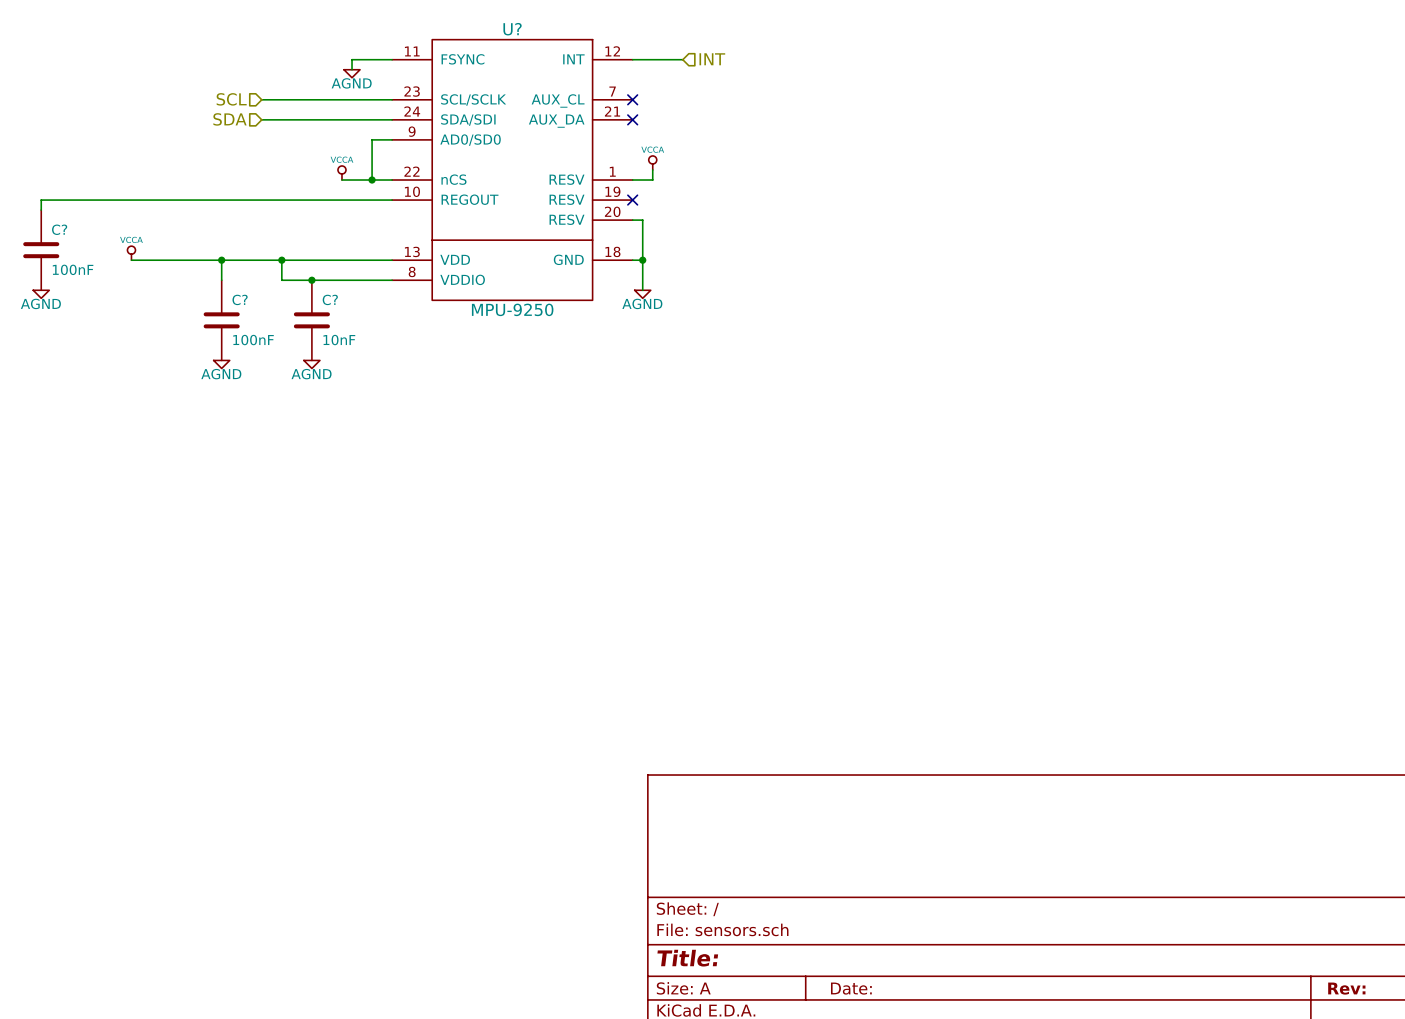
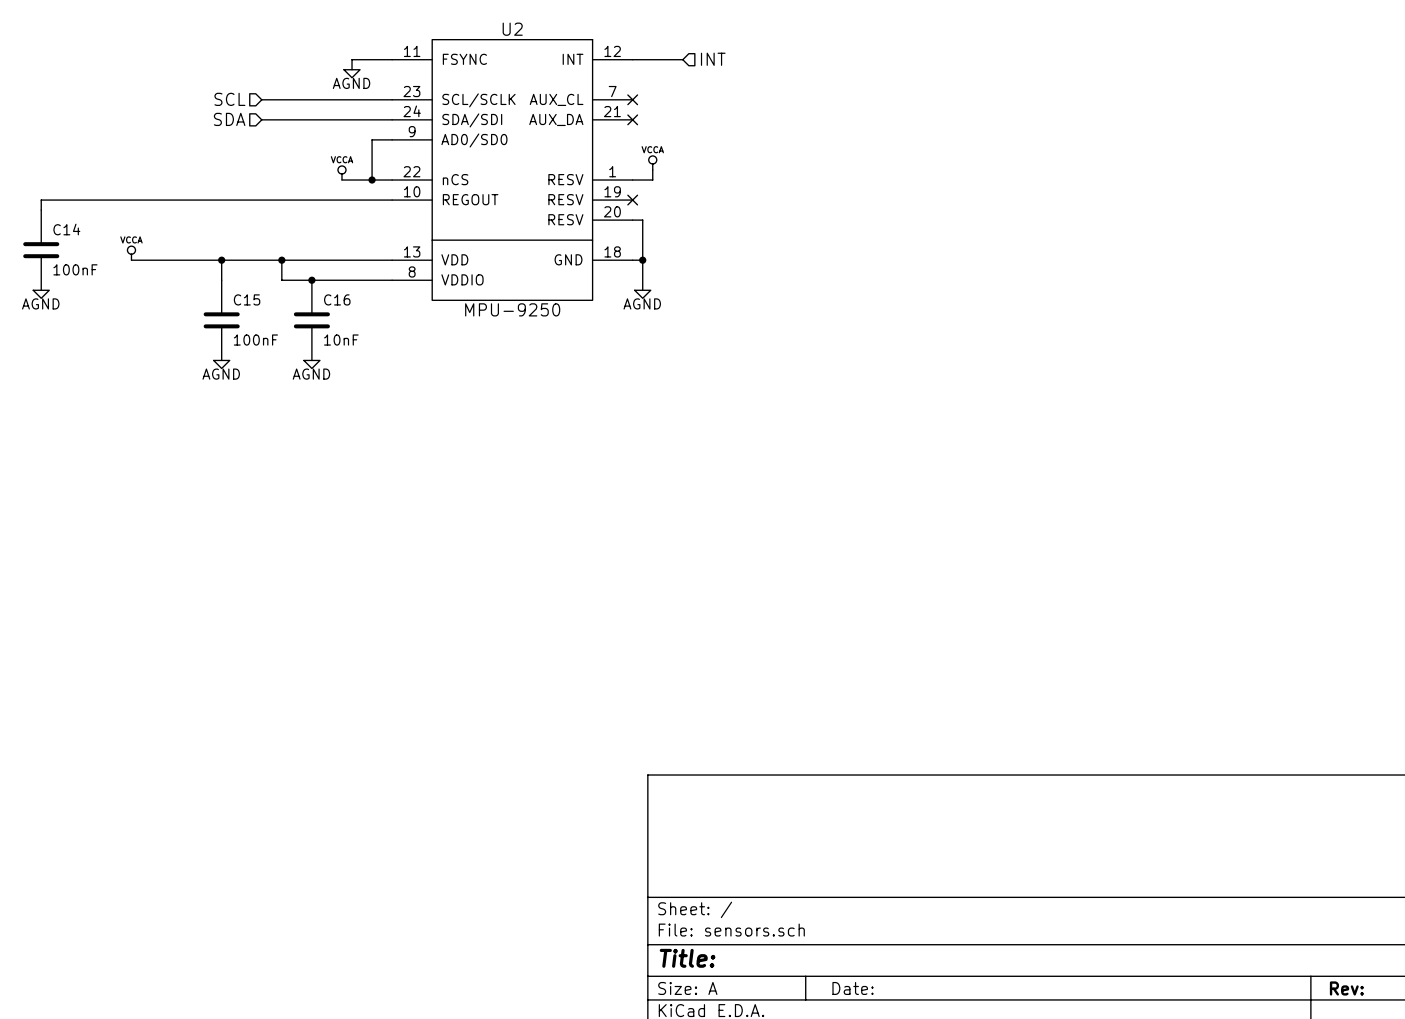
U? name: U? (512, 29) -> U2 (512, 29)
C? name: C? (59, 229) -> C14 (66, 229)
C? name: C? (240, 299) -> C15 (247, 299)
C? name: C? (330, 299) -> C16 (337, 299)

